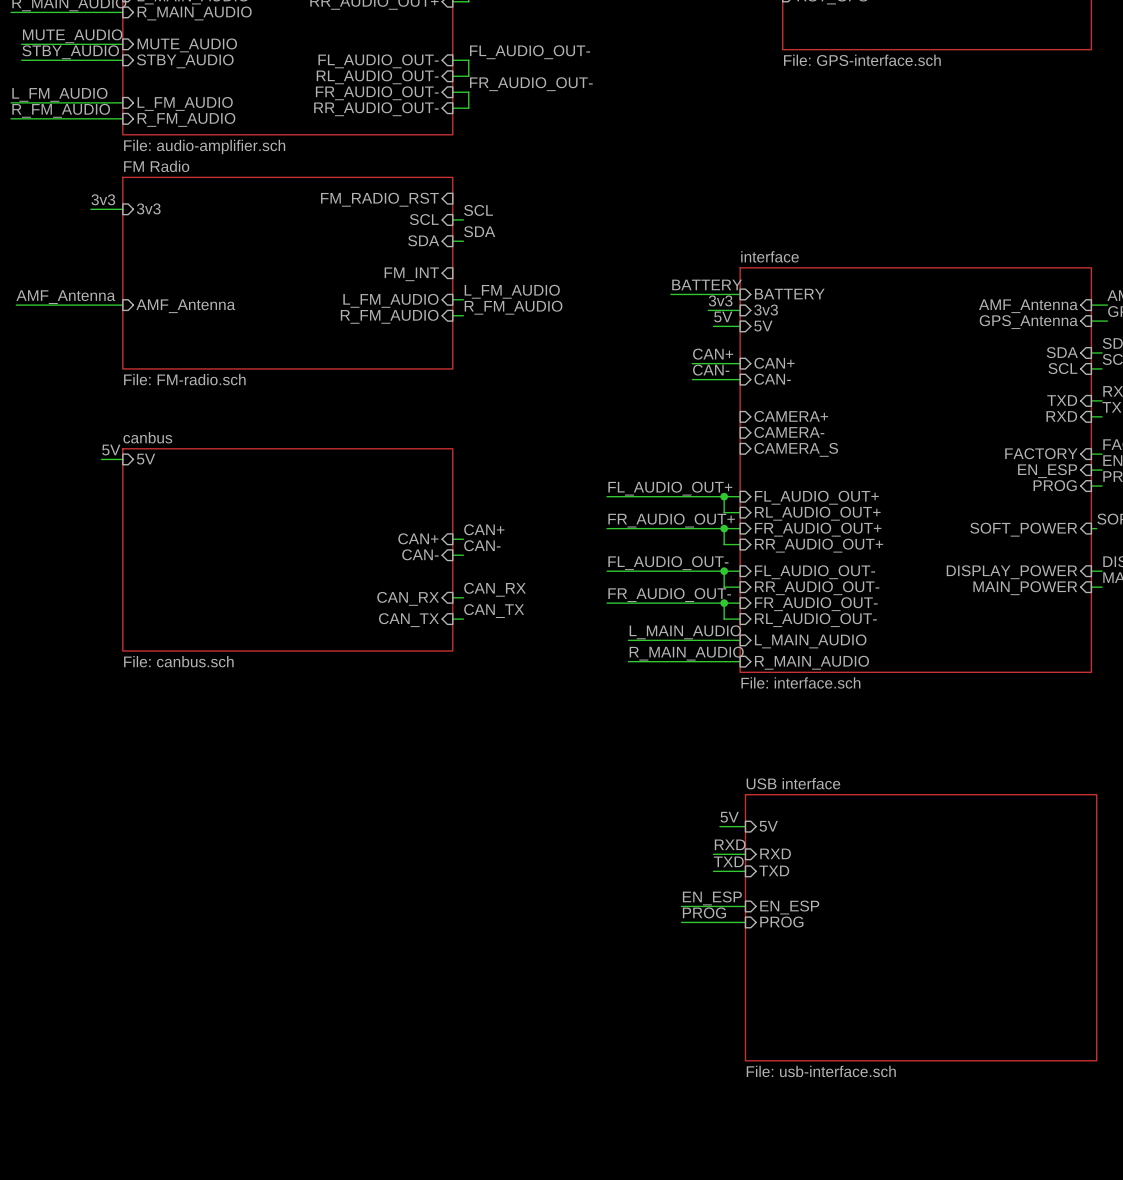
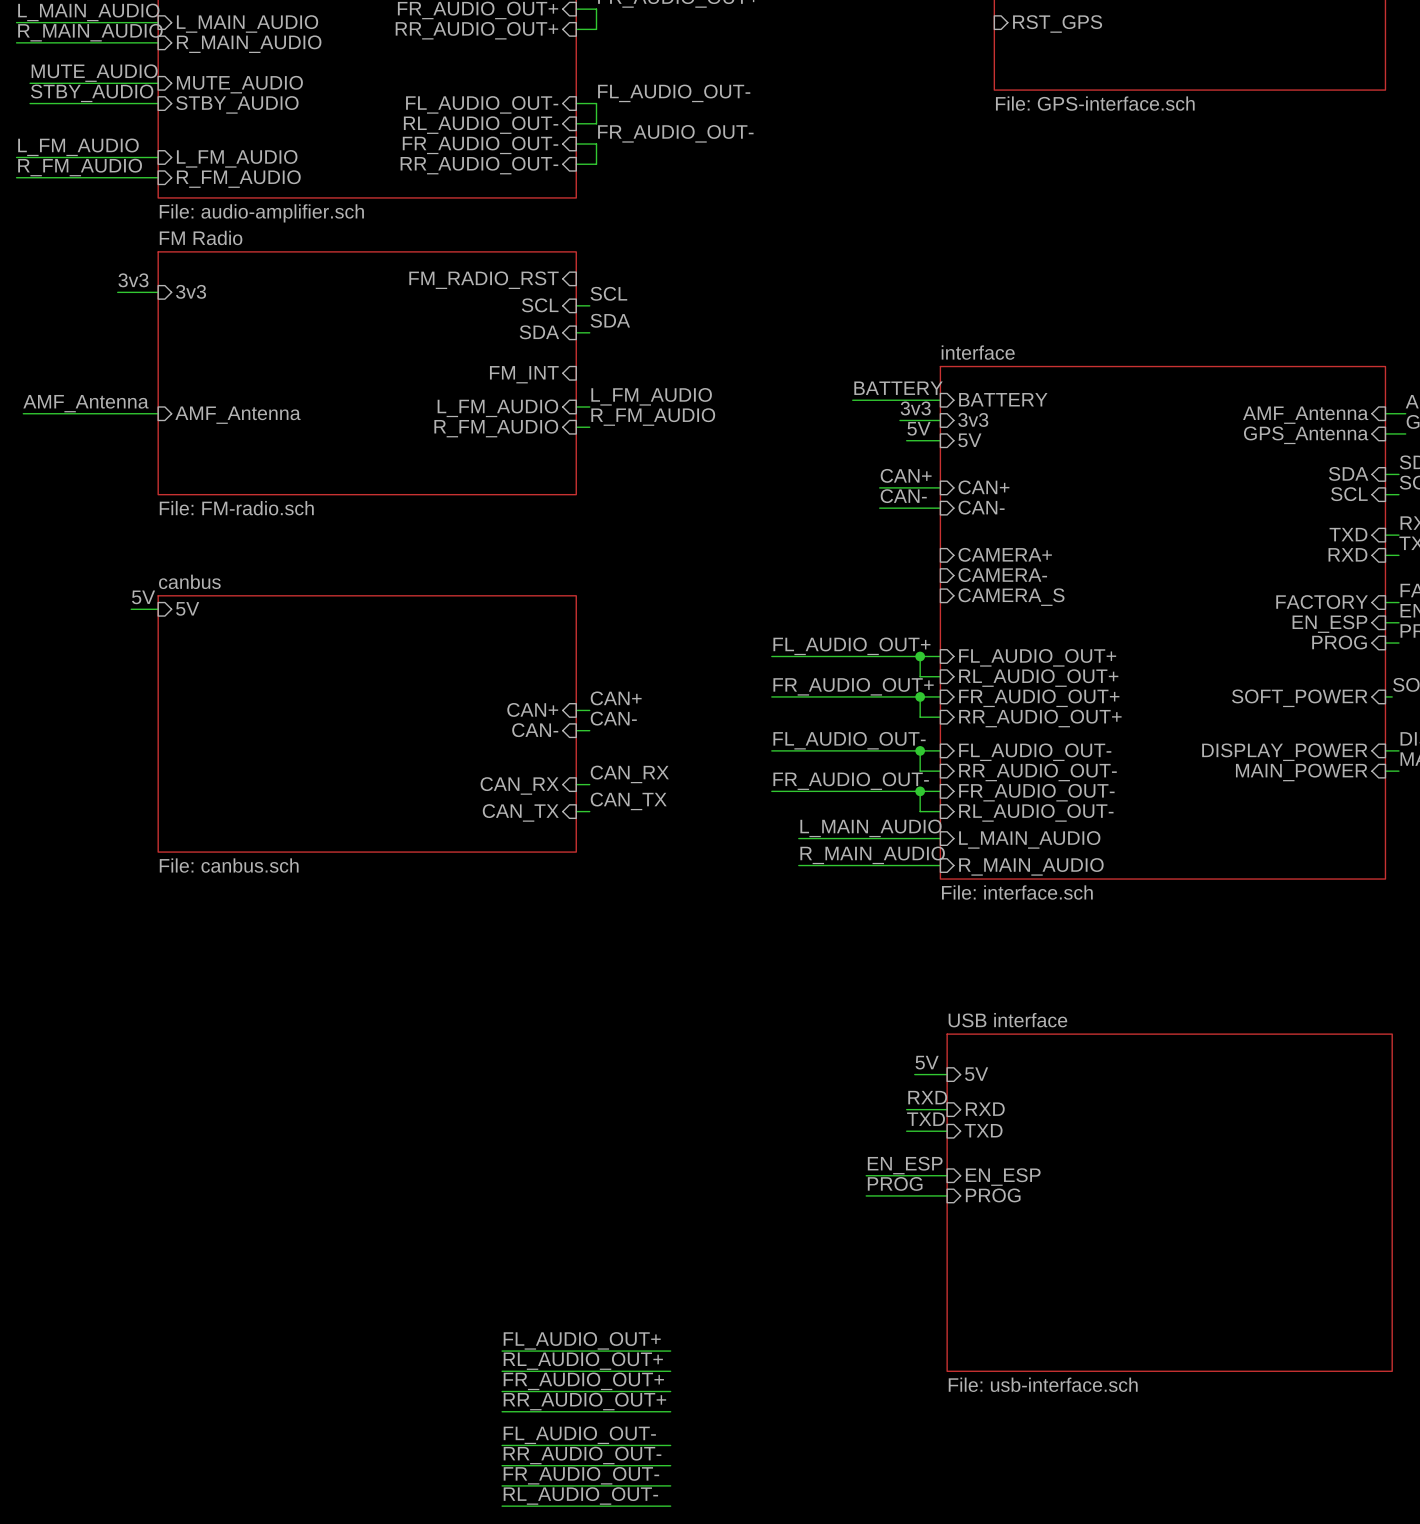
label: none -> FL_AUDIO_OUT+ (582, 1340)
wire: none -> (502, 1351) (670, 1351)
label: none -> RL_AUDIO_OUT+ (583, 1361)
wire: none -> (502, 1371) (670, 1371)
label: none -> FR_AUDIO_OUT+ (583, 1381)
wire: none -> (502, 1391) (670, 1391)
label: none -> RR_AUDIO_OUT+ (584, 1401)
wire: none -> (502, 1411) (670, 1411)
label: none -> FL_AUDIO_OUT- (579, 1435)
wire: none -> (502, 1445) (670, 1445)
label: none -> RR_AUDIO_OUT- (582, 1455)
wire: none -> (502, 1465) (670, 1465)
label: none -> FR_AUDIO_OUT- (581, 1475)
wire: none -> (502, 1485) (670, 1485)
label: none -> RL_AUDIO_OUT- (580, 1495)
wire: none -> (502, 1506) (670, 1506)

